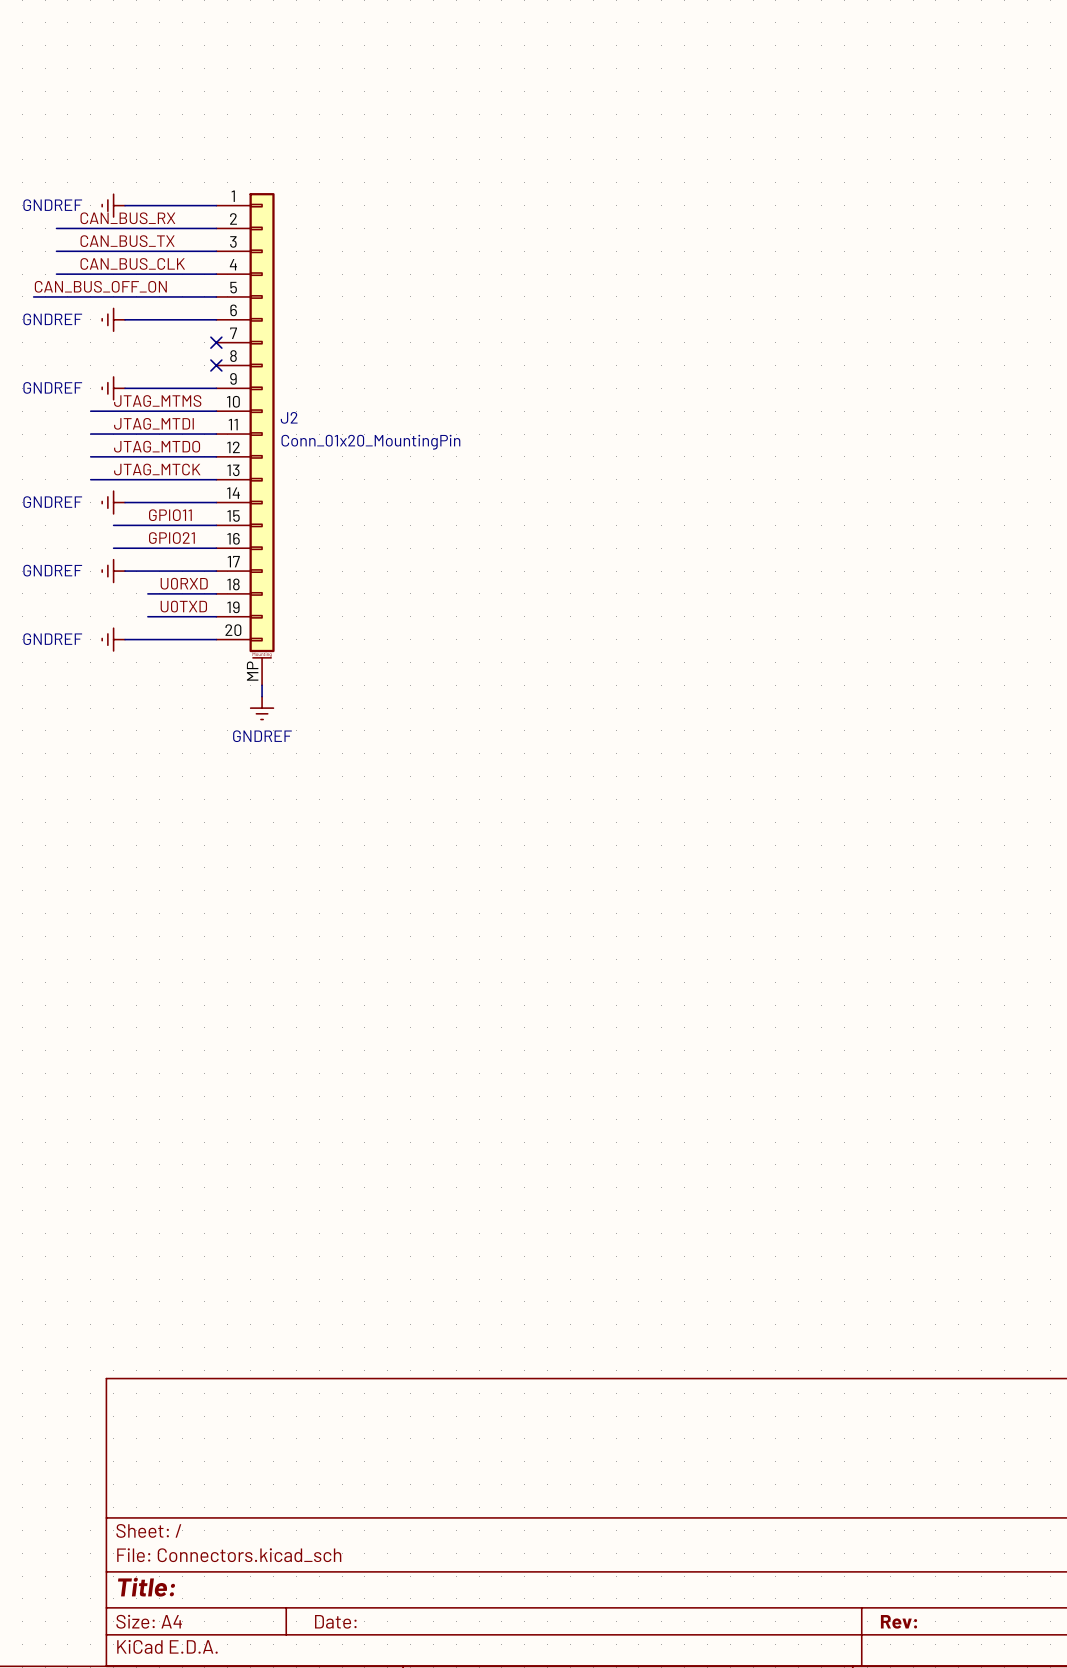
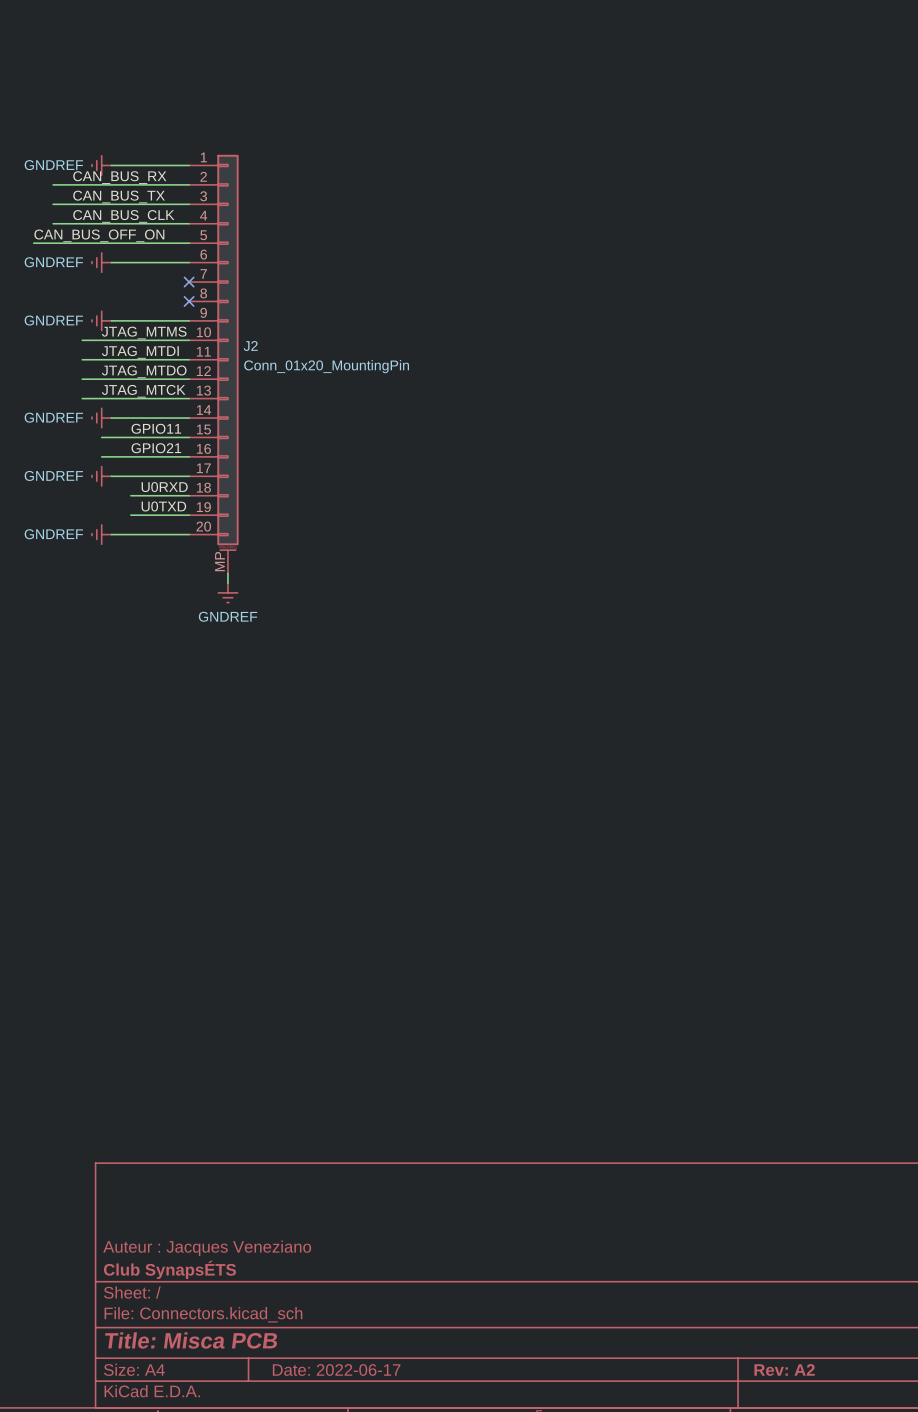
title block: none -> Auteur : Jacques Veneziano (207, 1248)
title block: none -> Club SynapsÉTS (169, 1269)
title block: Title: (146, 1587) -> Title: Misca PCB (191, 1340)
title block: Date: (335, 1621) -> Date: 2022-06-17 (336, 1370)
title block: Rev: (898, 1621) -> Rev: A2 (784, 1370)

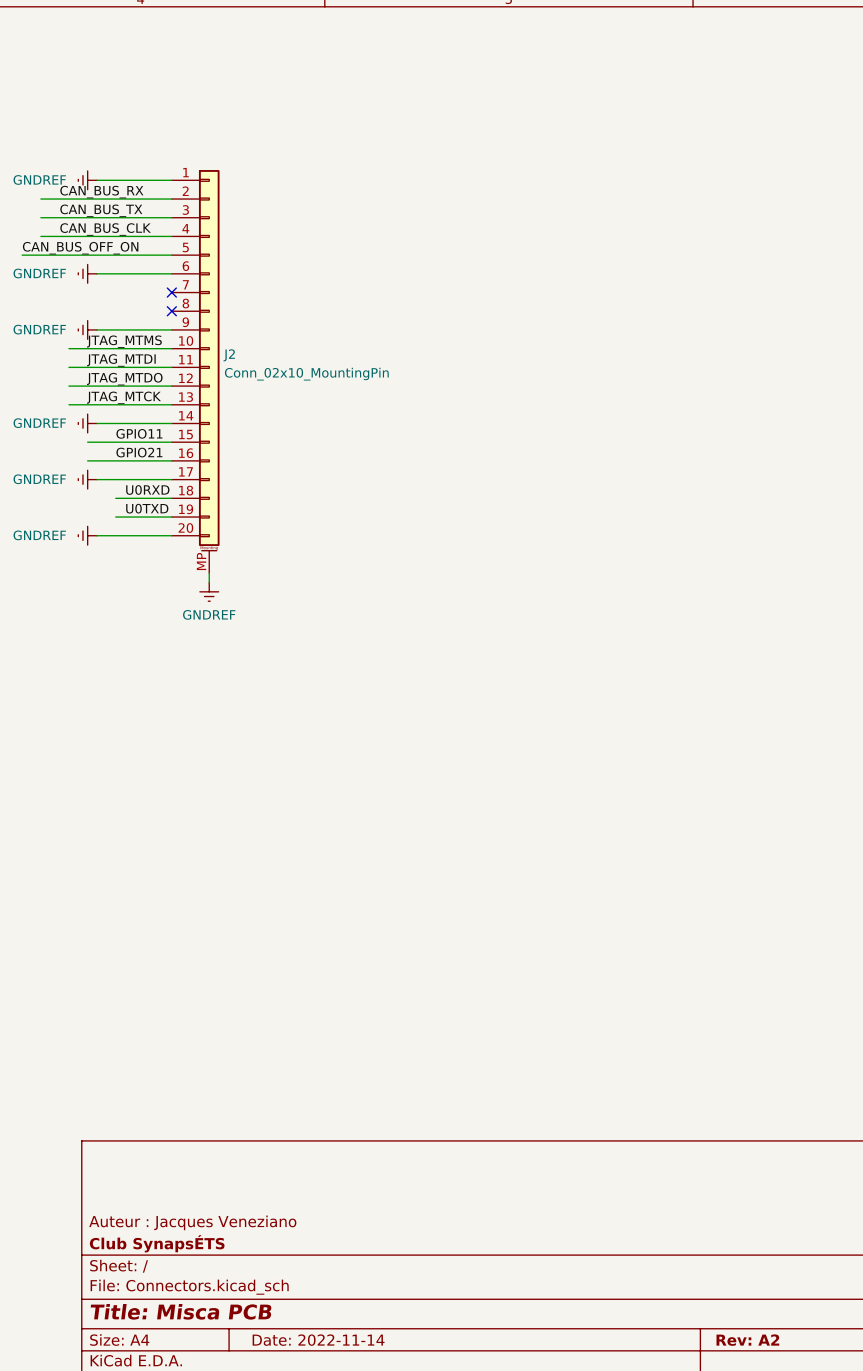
J2 value: Conn_01x20_MountingPin (326, 366) -> Conn_02x10_MountingPin (306, 374)
title block: Date: 2022-06-17 (336, 1370) -> Date: 2022-11-14 (318, 1340)

